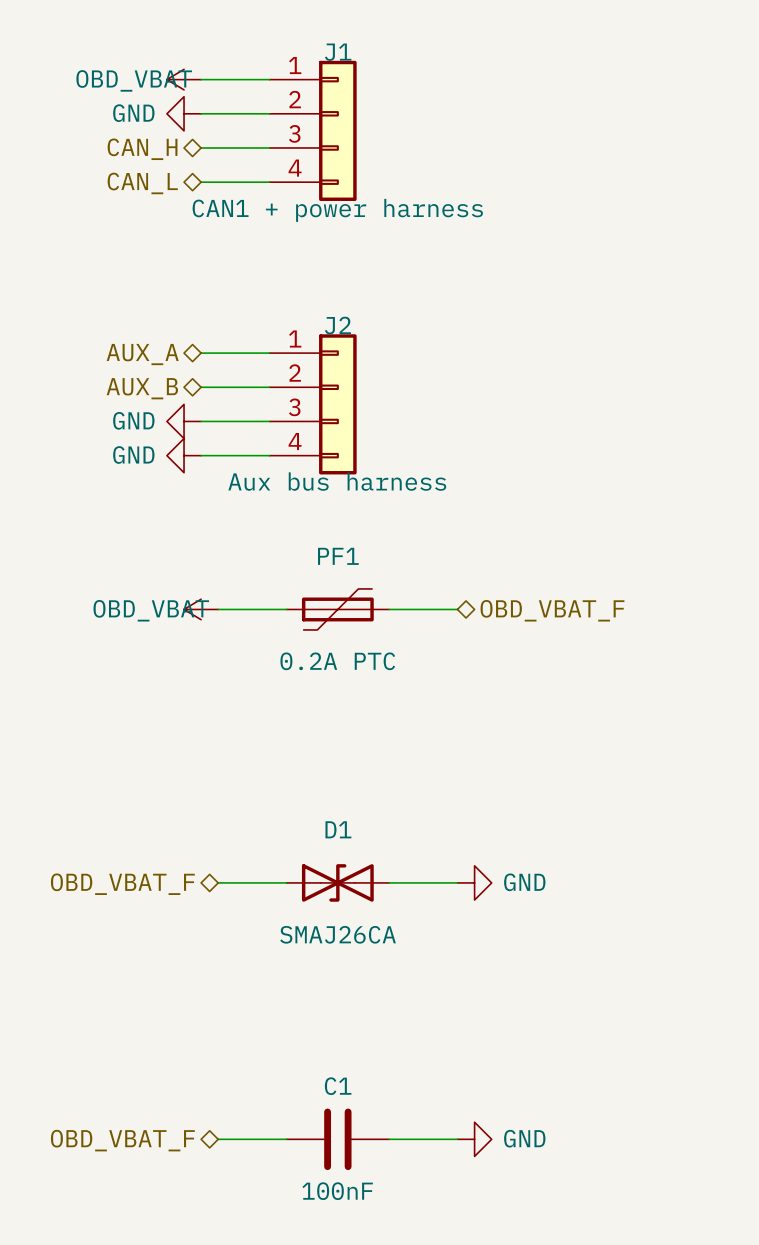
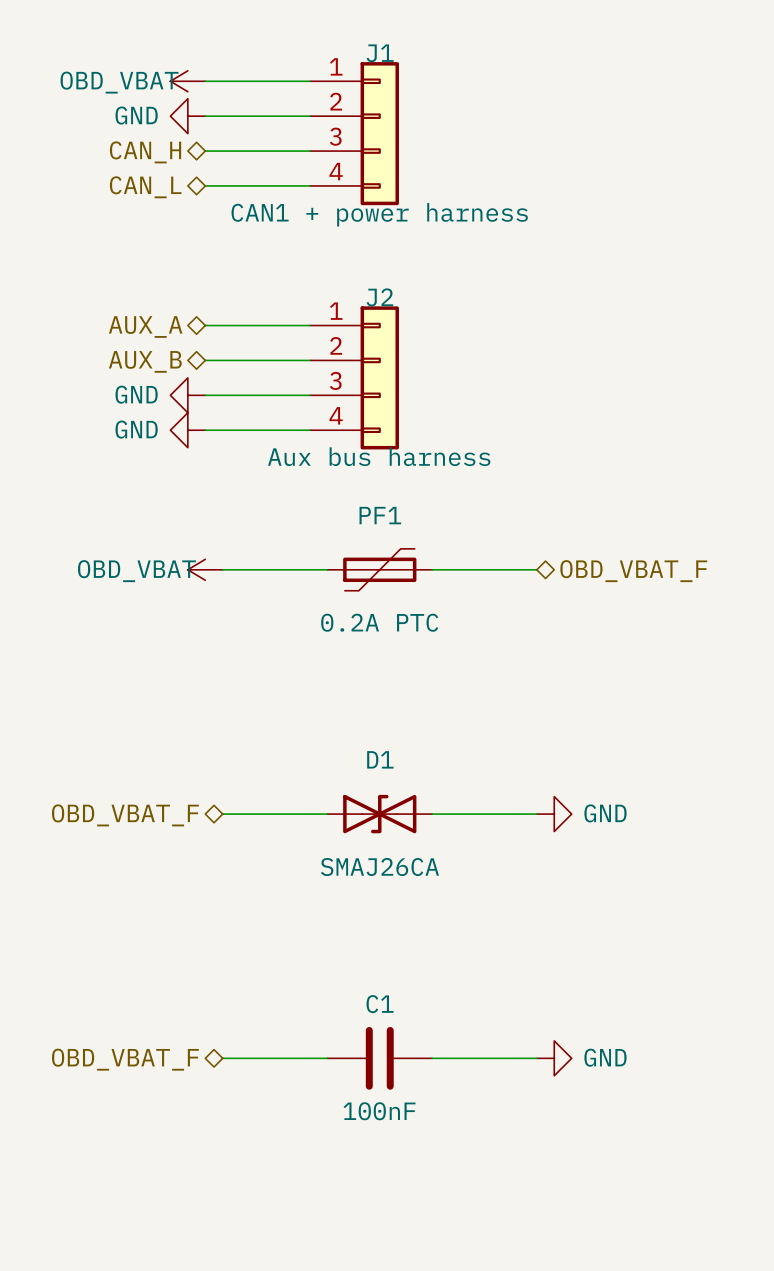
power symbol text position: OBD_VBAT (134, 80) -> OBD_VBAT (119, 82)
J1 position: (313, 130) -> (354, 133)
wire: none -> (205, 325) (309, 325)
hierarchical label: none -> AUX_A (145, 327)
hierarchical label: AUX_A (142, 354) -> AUX_B (145, 361)
hierarchical label: AUX_B (142, 388) -> none
J2 position: (313, 404) -> (354, 377)
power symbol position: GND (184, 455) -> GND (187, 395)
wire: (201, 455) (269, 455) -> none
wire: none -> (222, 569) (327, 569)
wire: none -> (432, 569) (536, 569)
power symbol position: OBD_VBAT (201, 609) -> OBD_VBAT (205, 569)
wire: (218, 609) (286, 609) -> none
PF1 position: (337, 609) -> (379, 569)
wire: (389, 609) (457, 609) -> none
power symbol text position: OBD_VBAT (151, 610) -> OBD_VBAT (136, 571)
hierarchical label position: OBD_VBAT_F (552, 610) -> OBD_VBAT_F (633, 571)
wire: none -> (222, 814) (327, 814)
wire: none -> (432, 814) (536, 814)
power symbol: none -> GND (554, 814)
hierarchical label: none -> OBD_VBAT_F (125, 815)
wire: (218, 882) (286, 882) -> none
D1 position: (337, 882) -> (379, 814)
wire: (389, 882) (457, 882) -> none
power symbol: GND (474, 882) -> none
hierarchical label: OBD_VBAT_F (122, 884) -> none
wire: none -> (222, 1058) (327, 1058)
wire: none -> (432, 1058) (536, 1058)
power symbol: none -> GND (554, 1058)
hierarchical label: none -> OBD_VBAT_F (125, 1059)
wire: (218, 1139) (286, 1139) -> none
C1 position: (337, 1139) -> (379, 1058)
wire: (389, 1139) (457, 1139) -> none
power symbol: GND (474, 1139) -> none
hierarchical label: OBD_VBAT_F (122, 1140) -> none

